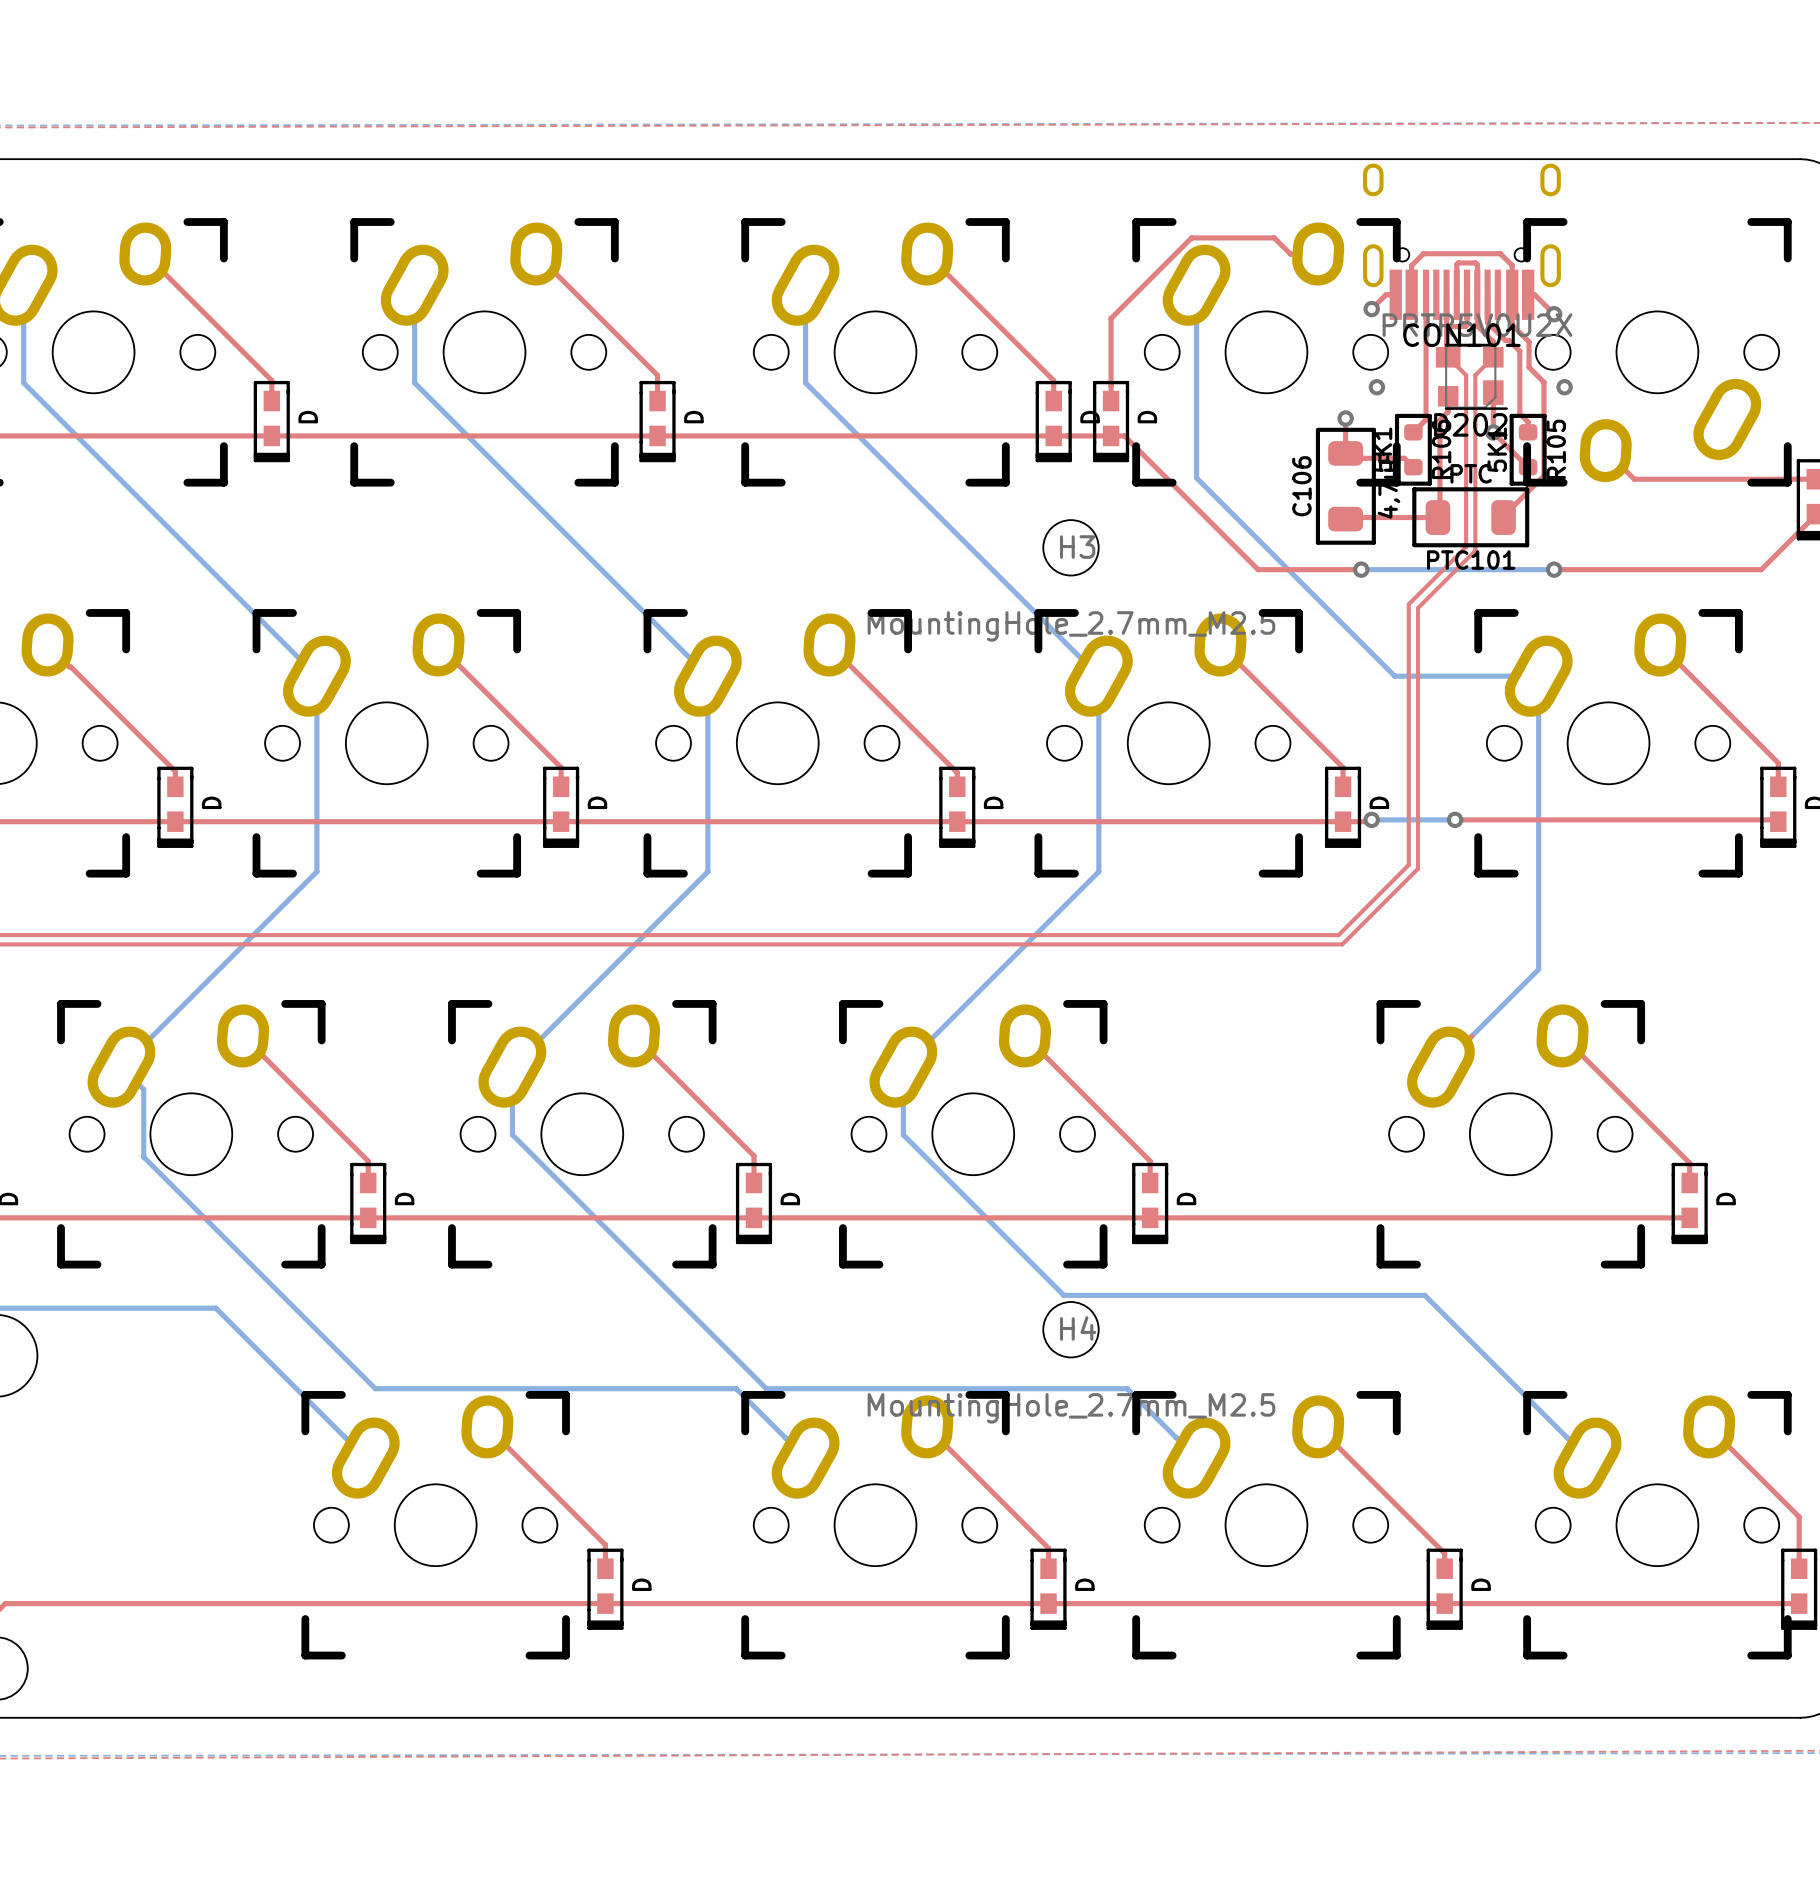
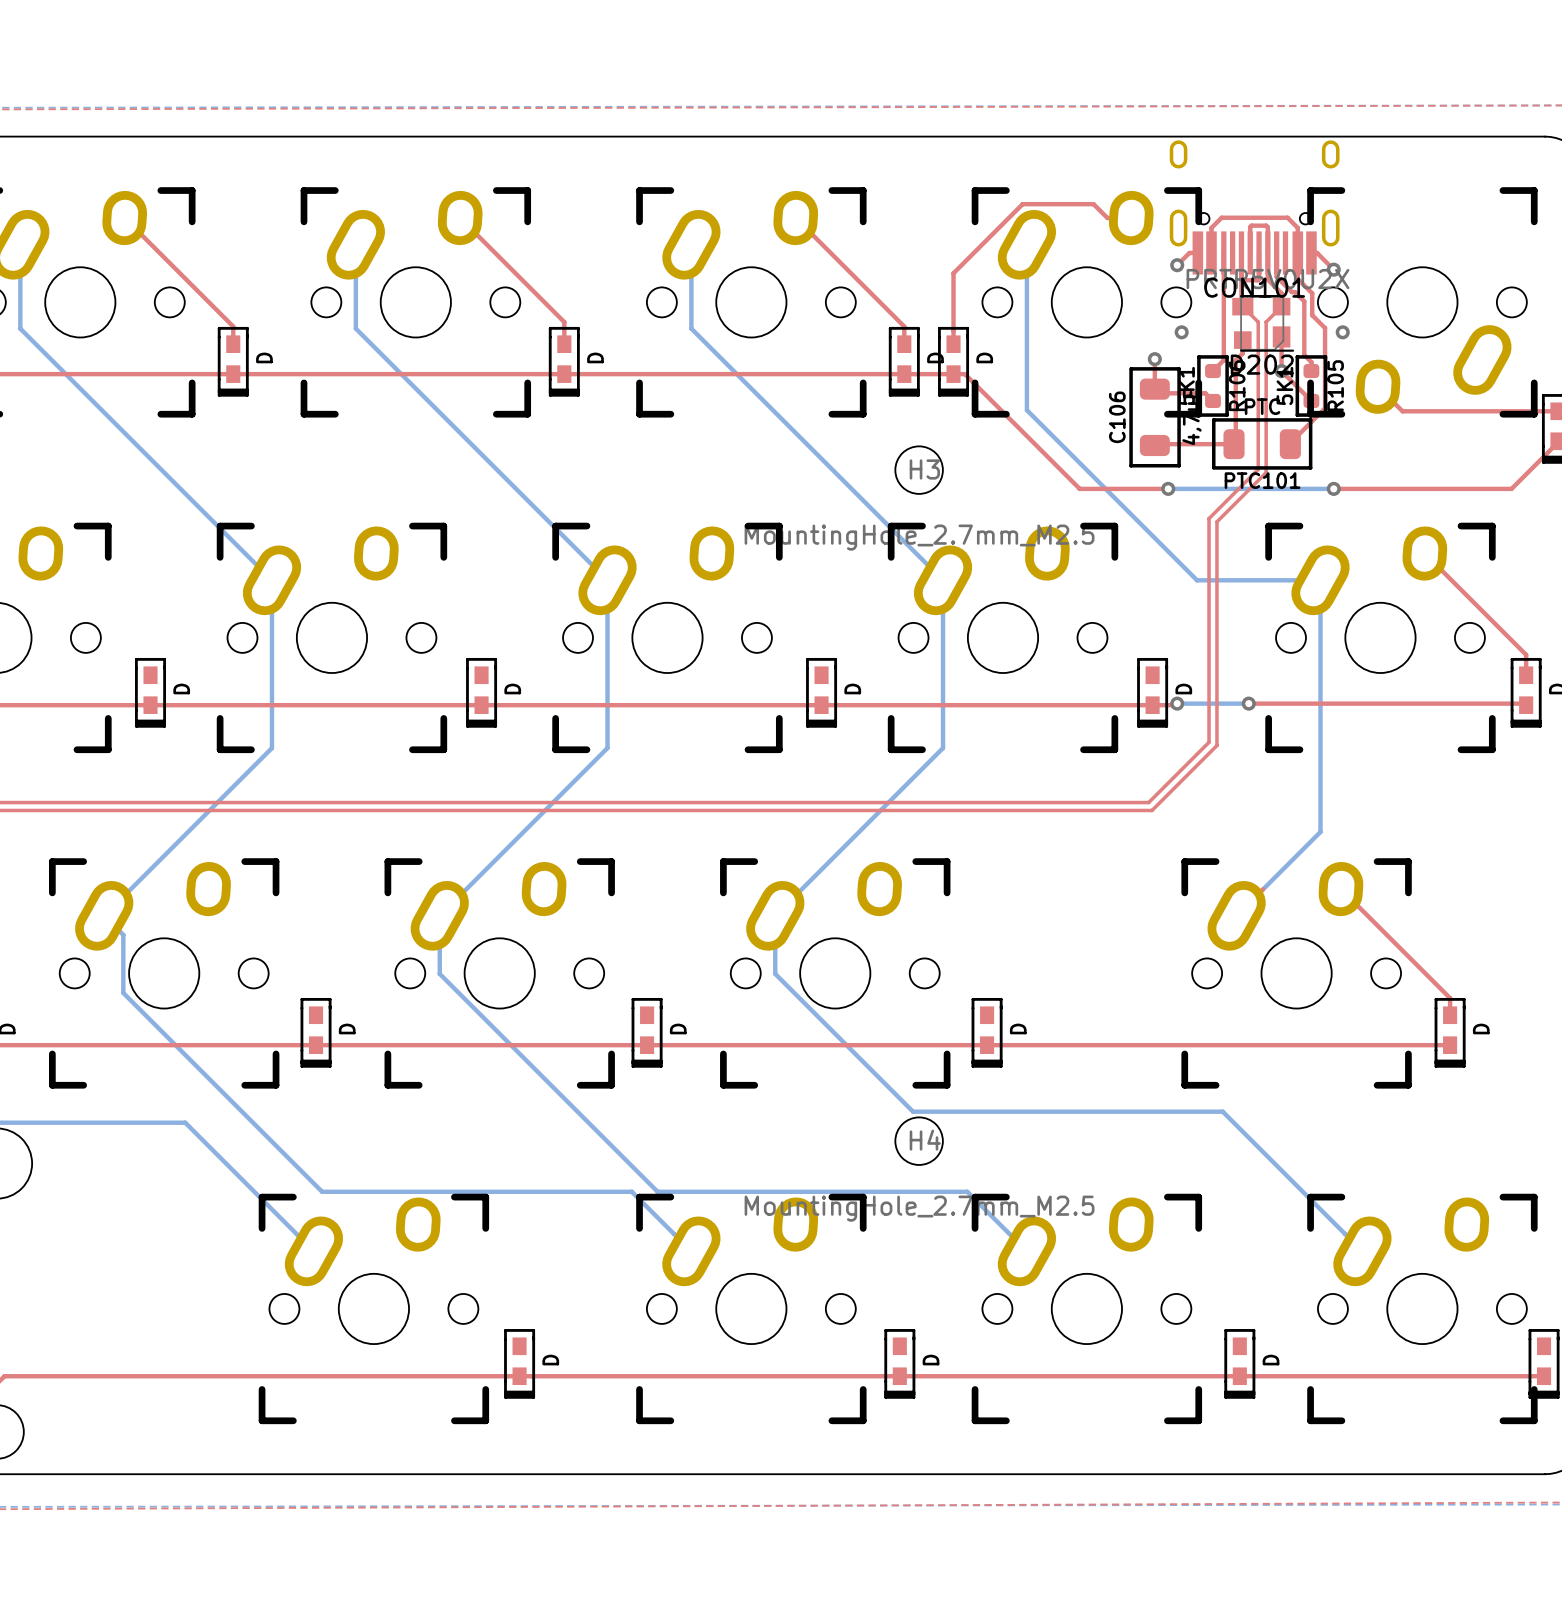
top track: (47, 644) (175, 771) (175, 786) -> none
top track: (438, 644) (561, 767) (561, 786) -> none
top track: (829, 644) (957, 772) (957, 786) -> none
top track: (1220, 644) (1343, 767) (1343, 786) -> none
top track: (243, 1035) (368, 1161) (368, 1182) -> none
top track: (634, 1035) (753, 1155) (753, 1182) -> none
top track: (1024, 1035) (1150, 1161) (1150, 1182) -> none
top track: (487, 1426) (605, 1544) (605, 1568) -> none
top track: (927, 1426) (1048, 1548) (1048, 1568) -> none
top track: (1318, 1426) (1444, 1553) (1444, 1568) -> none
top track: (1709, 1426) (1799, 1516) (1799, 1568) -> none

